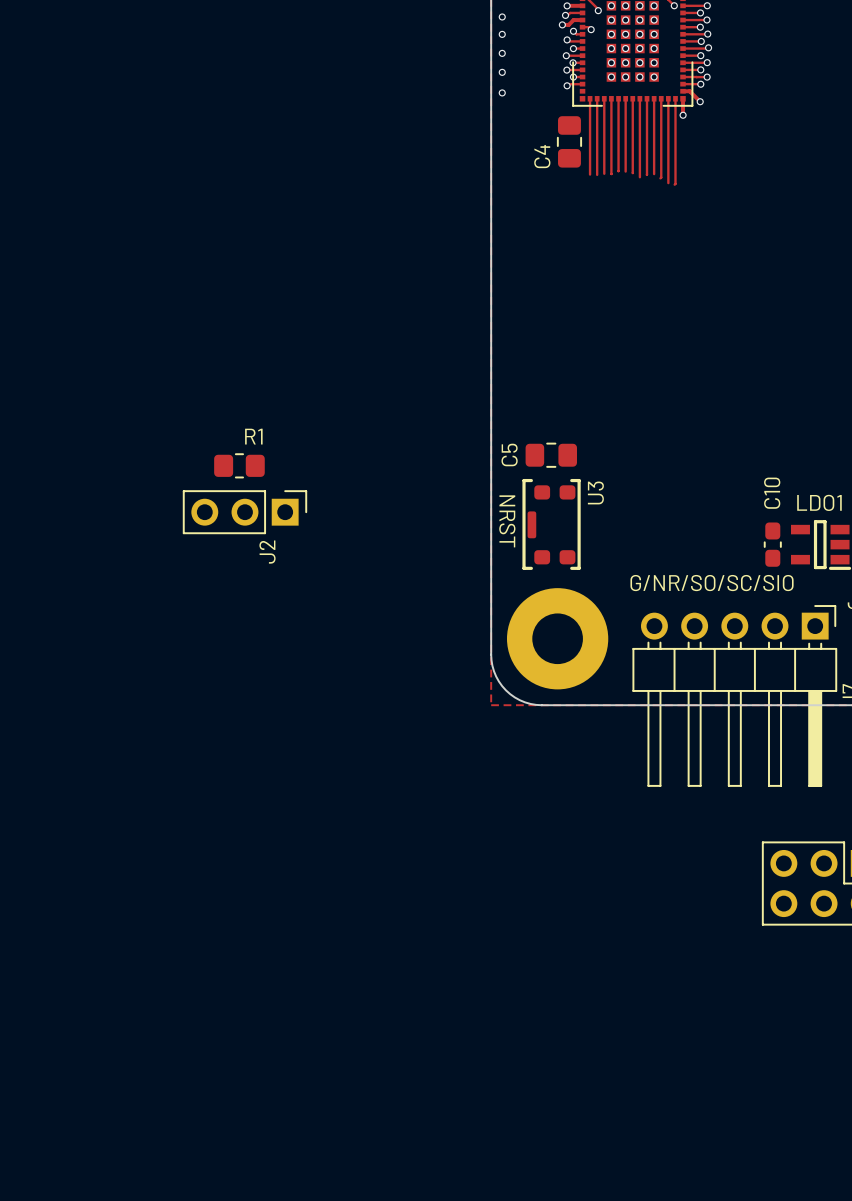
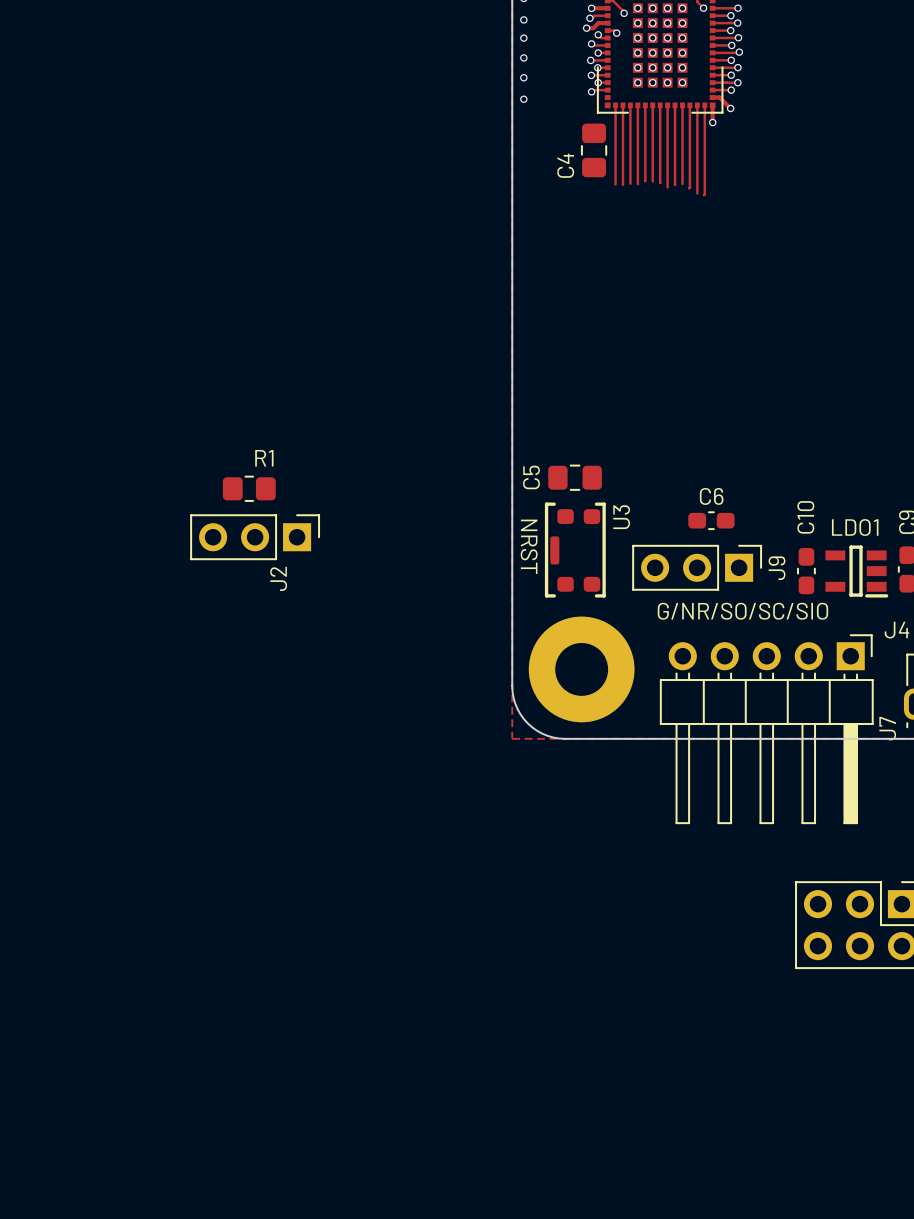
C6: none -> (711, 520)
J9: none -> (697, 567)

